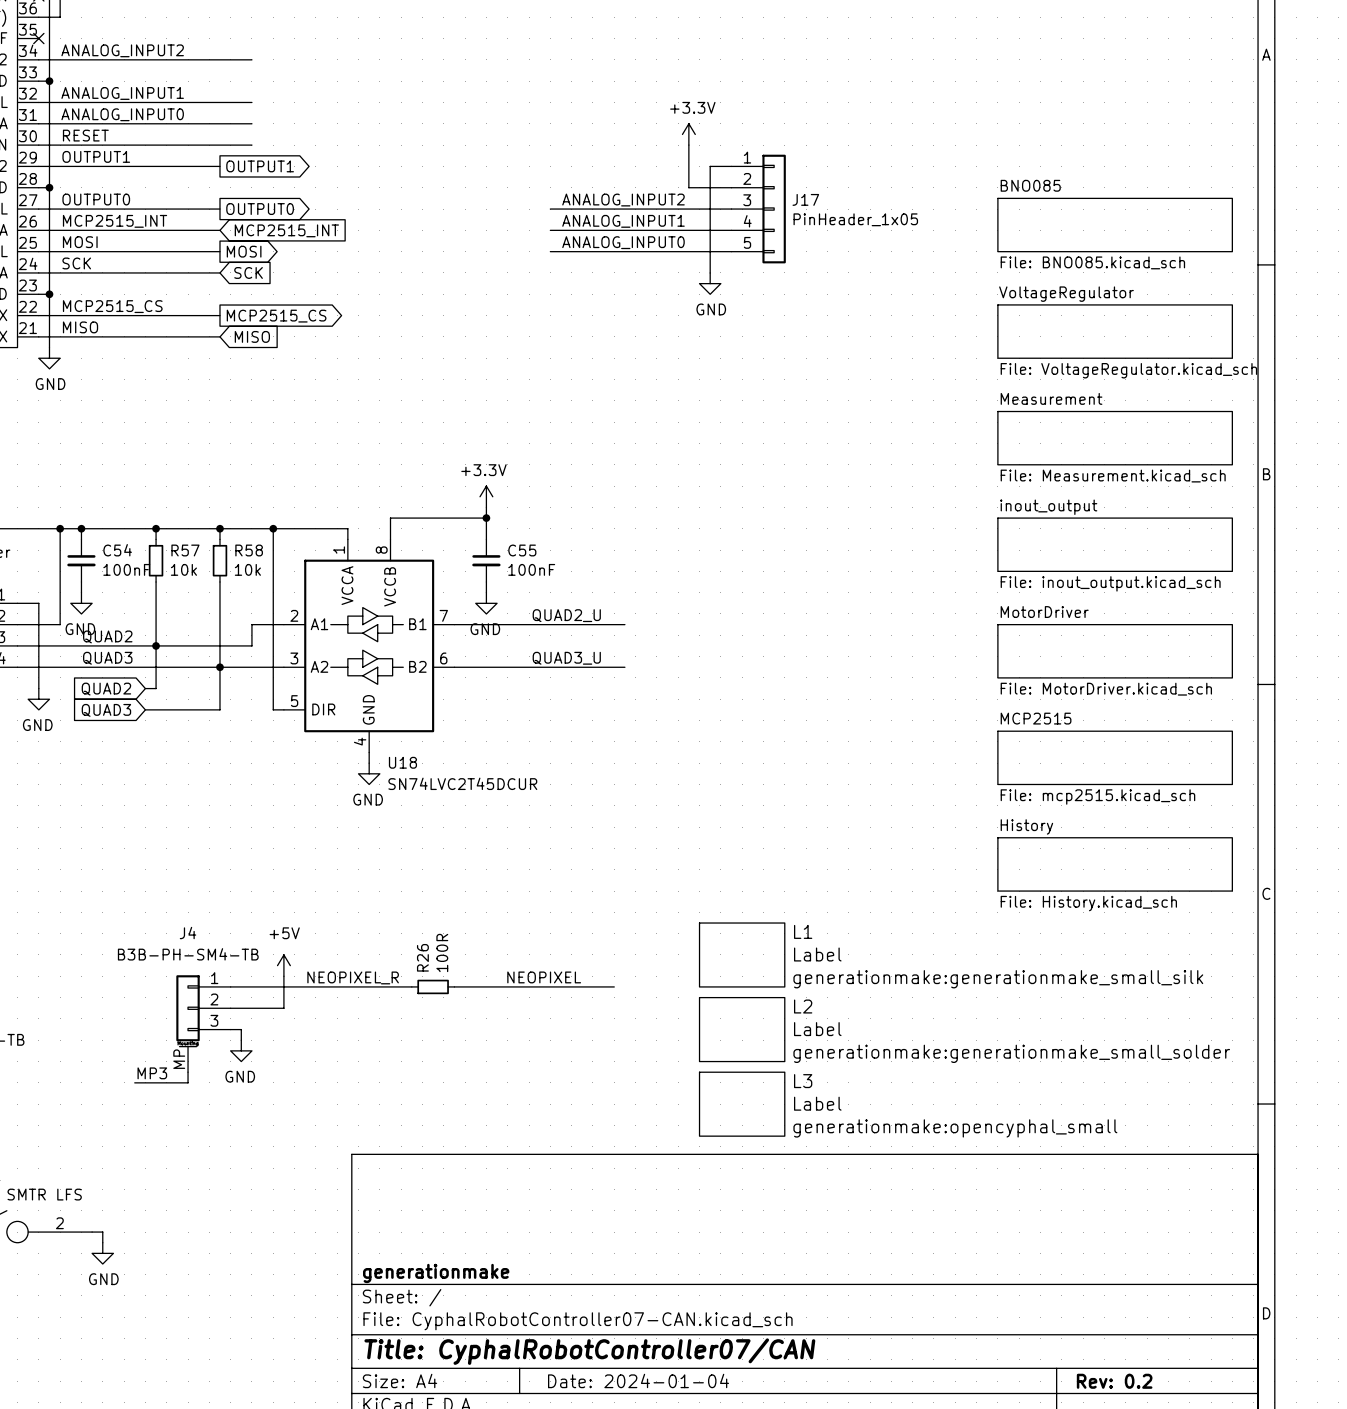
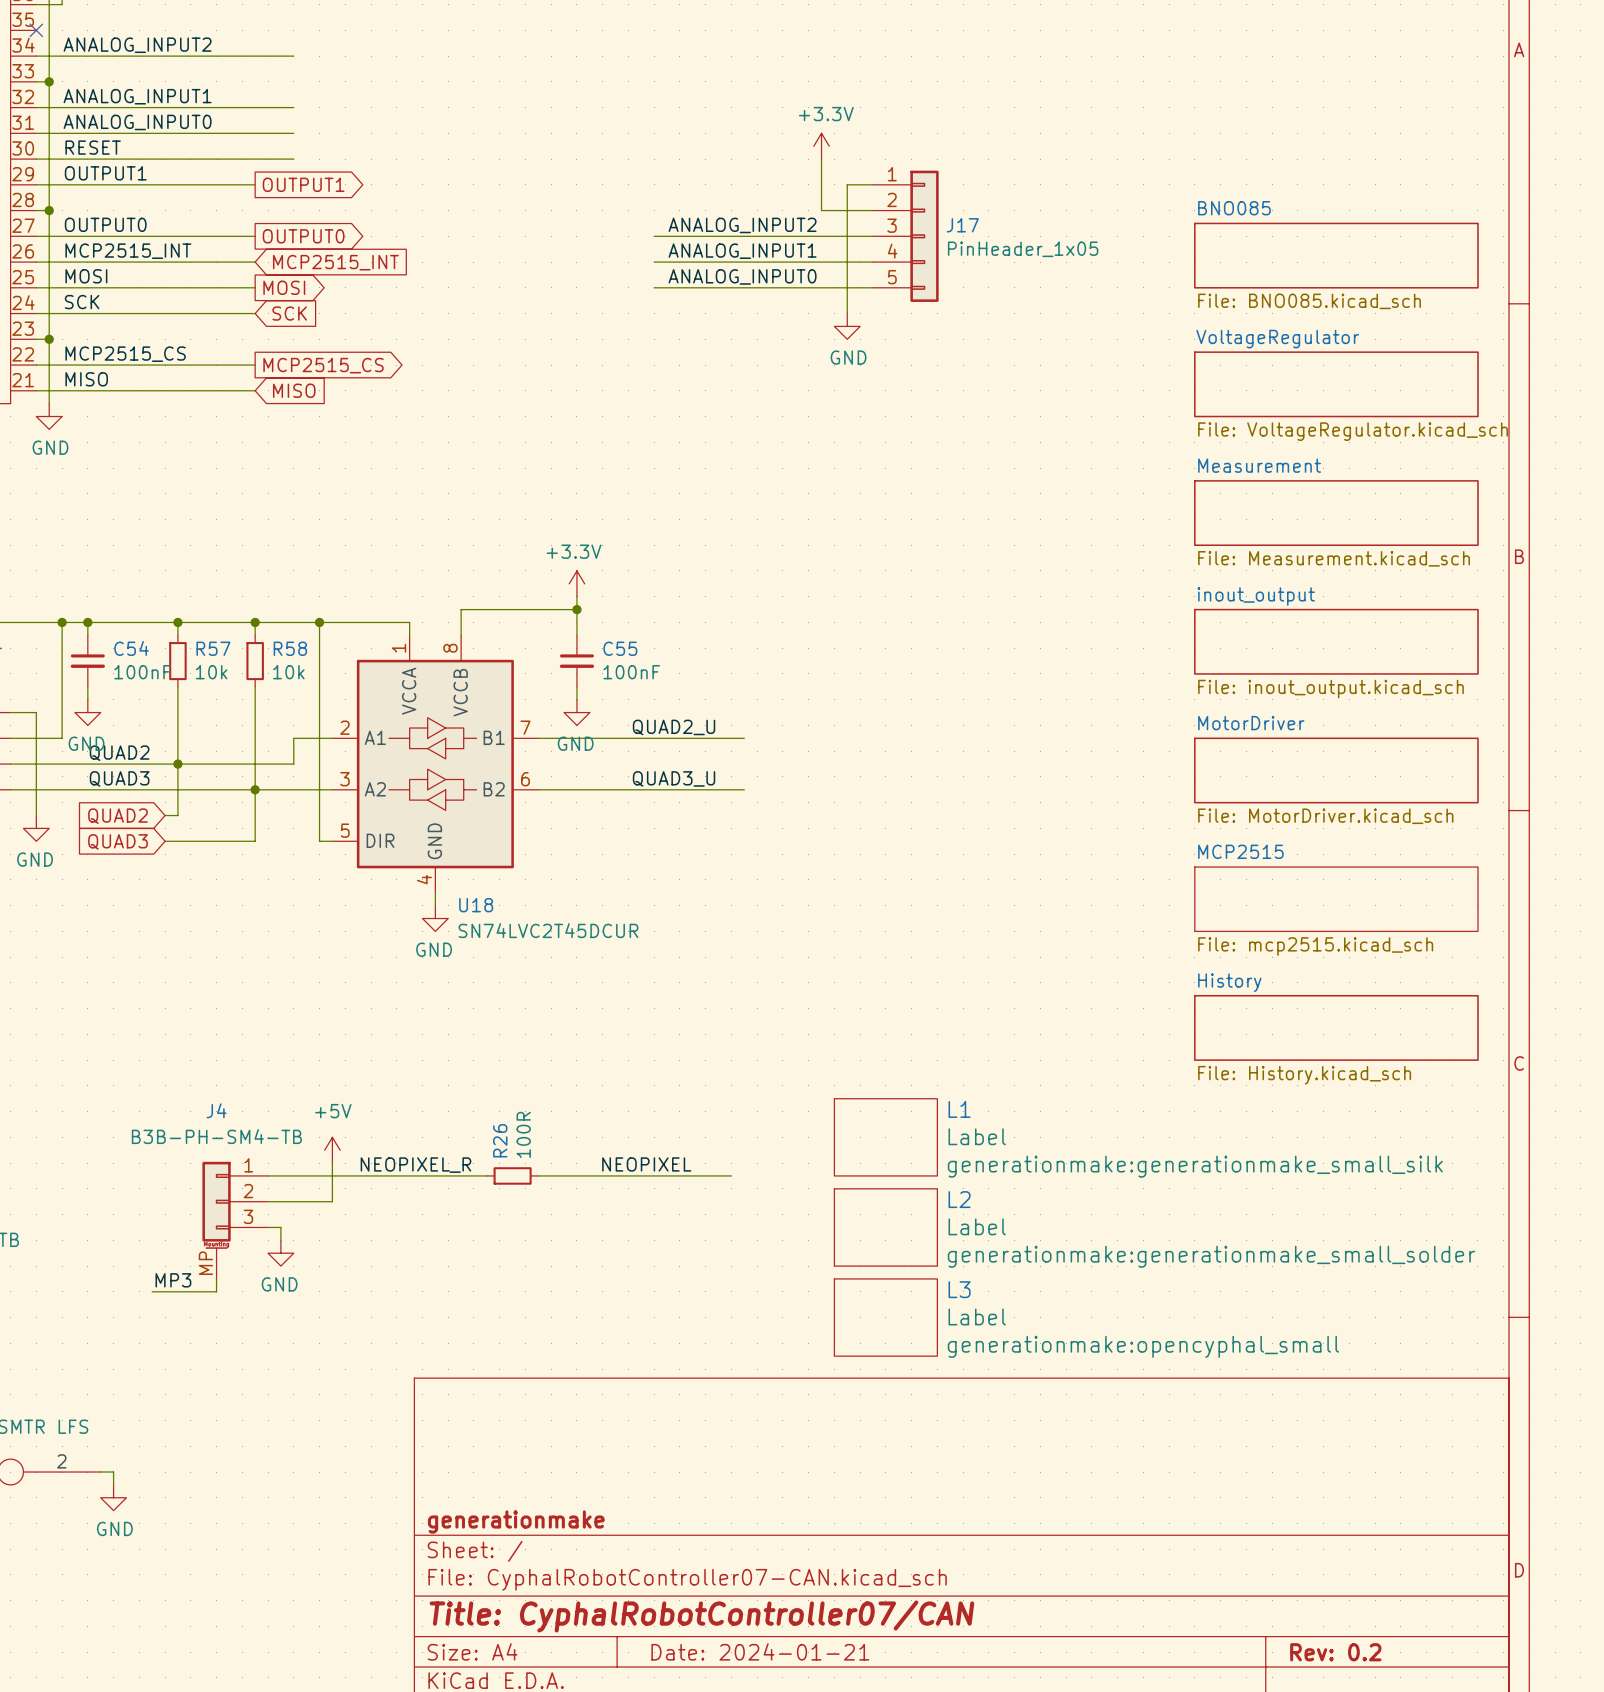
title block: Date: 2024-01-04 (638, 1380) -> Date: 2024-01-21 (760, 1651)

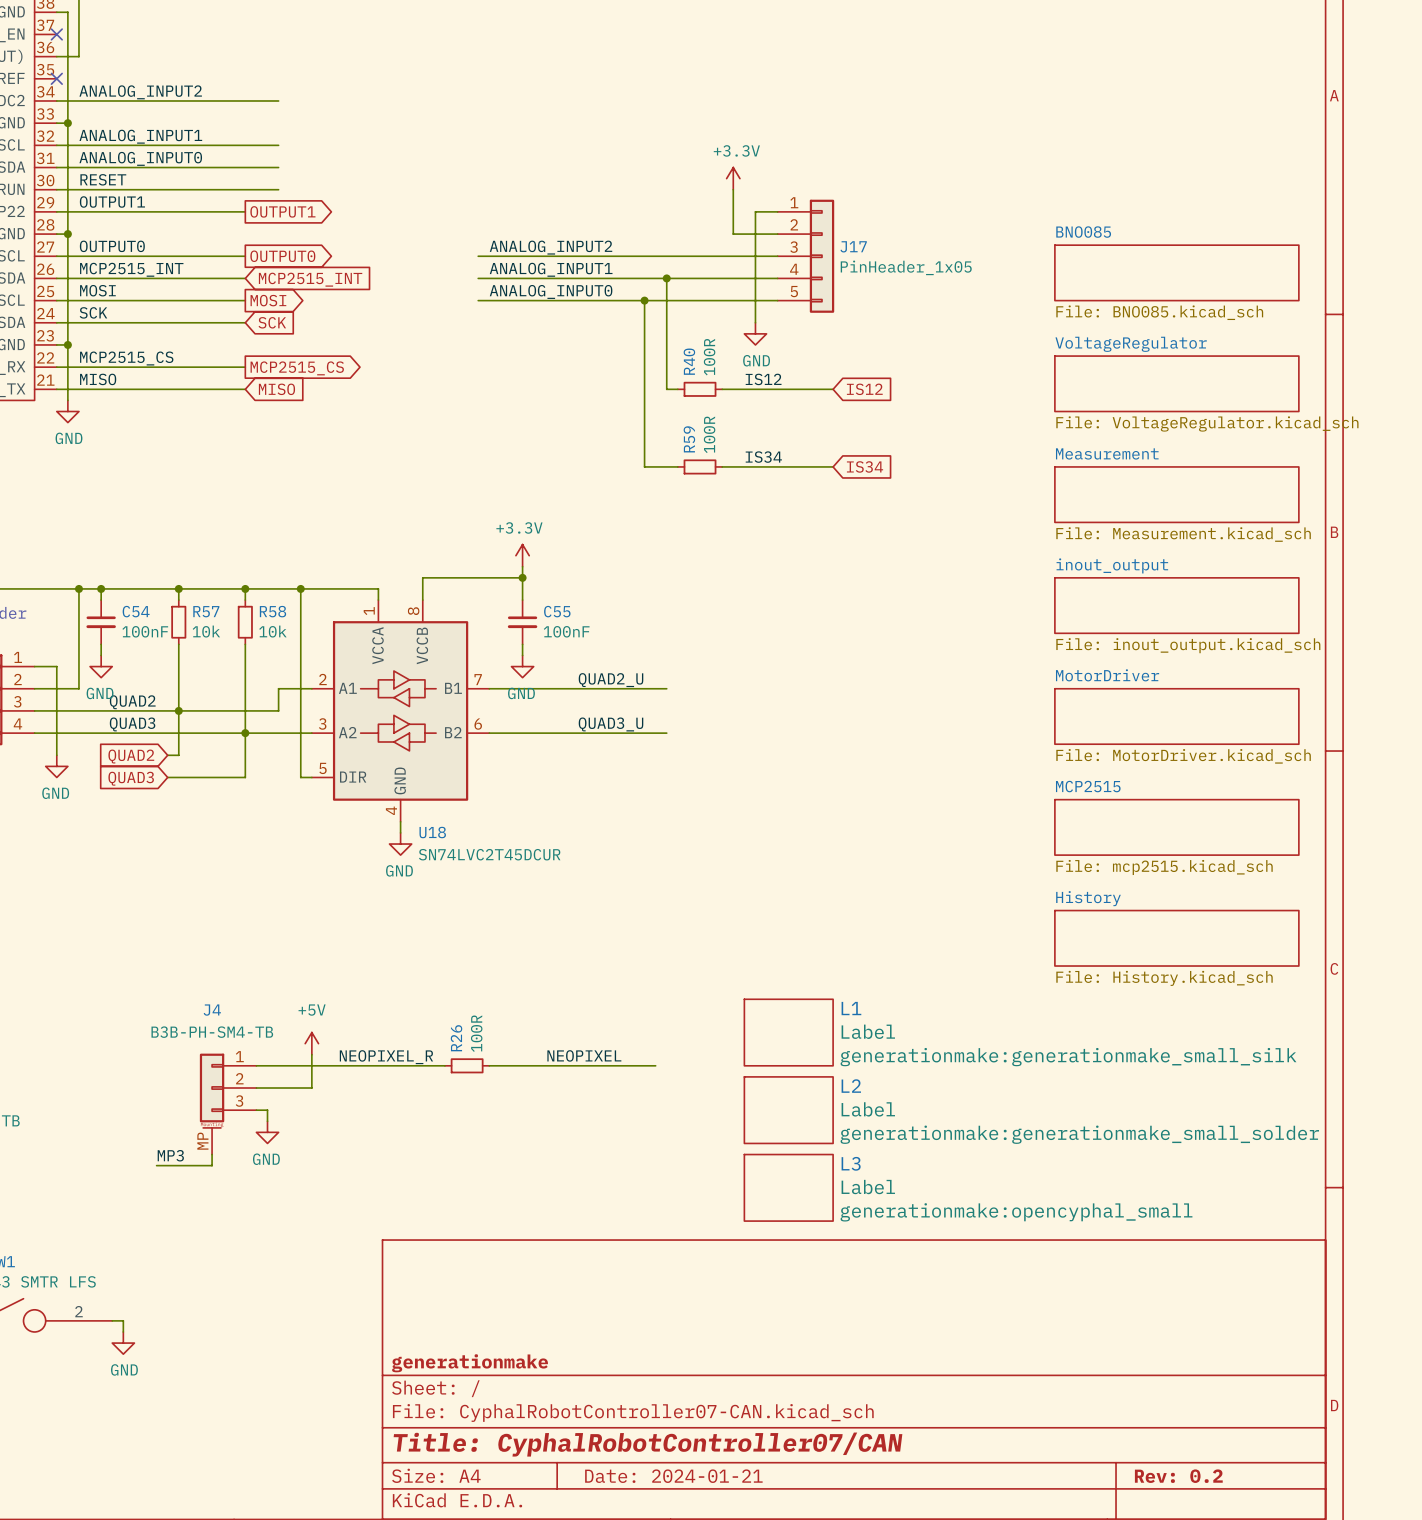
label position: ANALOG_INPUT2 (742, 225) -> ANALOG_INPUT2 (551, 247)
wire: none -> (478, 256) (589, 256)
label position: ANALOG_INPUT1 (742, 251) -> ANALOG_INPUT1 (551, 269)
wire: none -> (478, 278) (589, 278)
wire: none -> (666, 278) (666, 389) (677, 389)
junction: none -> (666, 278)
label position: ANALOG_INPUT0 (742, 276) -> ANALOG_INPUT0 (551, 291)
wire: none -> (478, 300) (589, 300)
wire: none -> (644, 300) (644, 466) (677, 466)
junction: none -> (644, 300)
label: none -> IS12 (763, 379)
R40: none -> 100R (700, 389)
wire: none -> (722, 389) (833, 389)
global label: none -> IS12 (864, 389)
label: none -> IS34 (763, 457)
R59: none -> 100R (700, 466)
wire: none -> (722, 466) (833, 466)
global label: none -> IS34 (865, 466)

